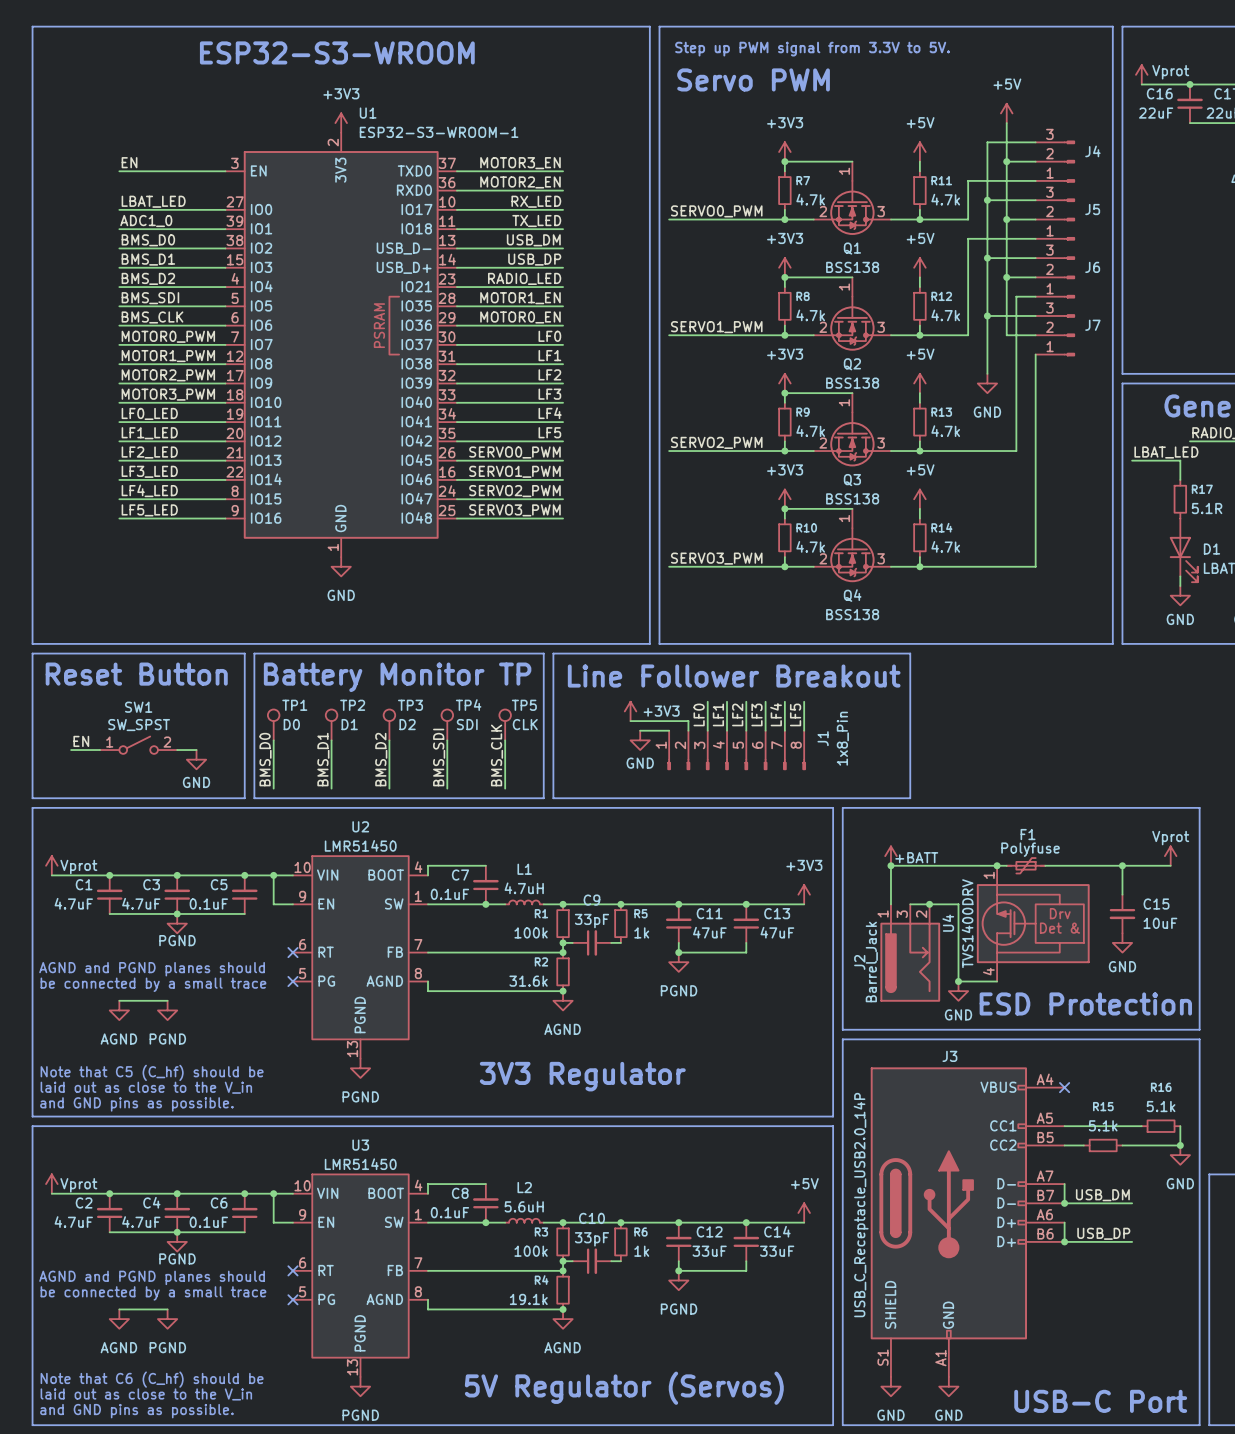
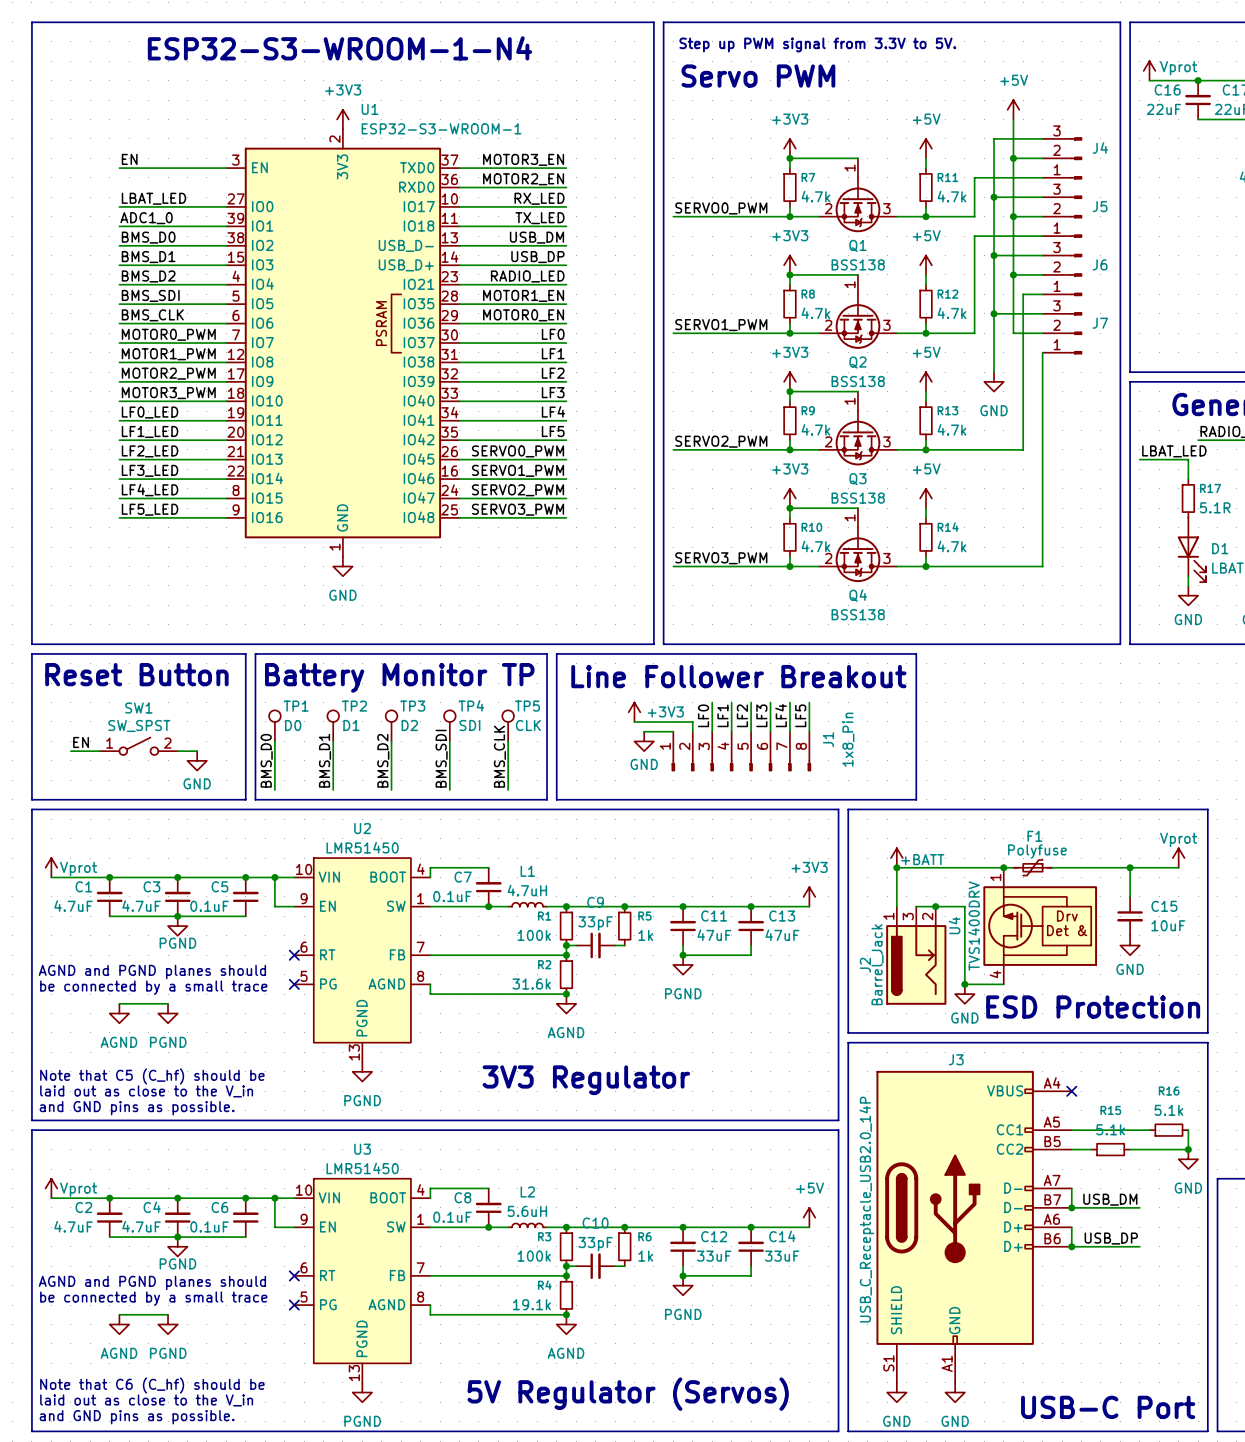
text: ESP32-S3-WROOM (337, 52) -> ESP32-S3-WROOM-1-N4 (339, 48)

